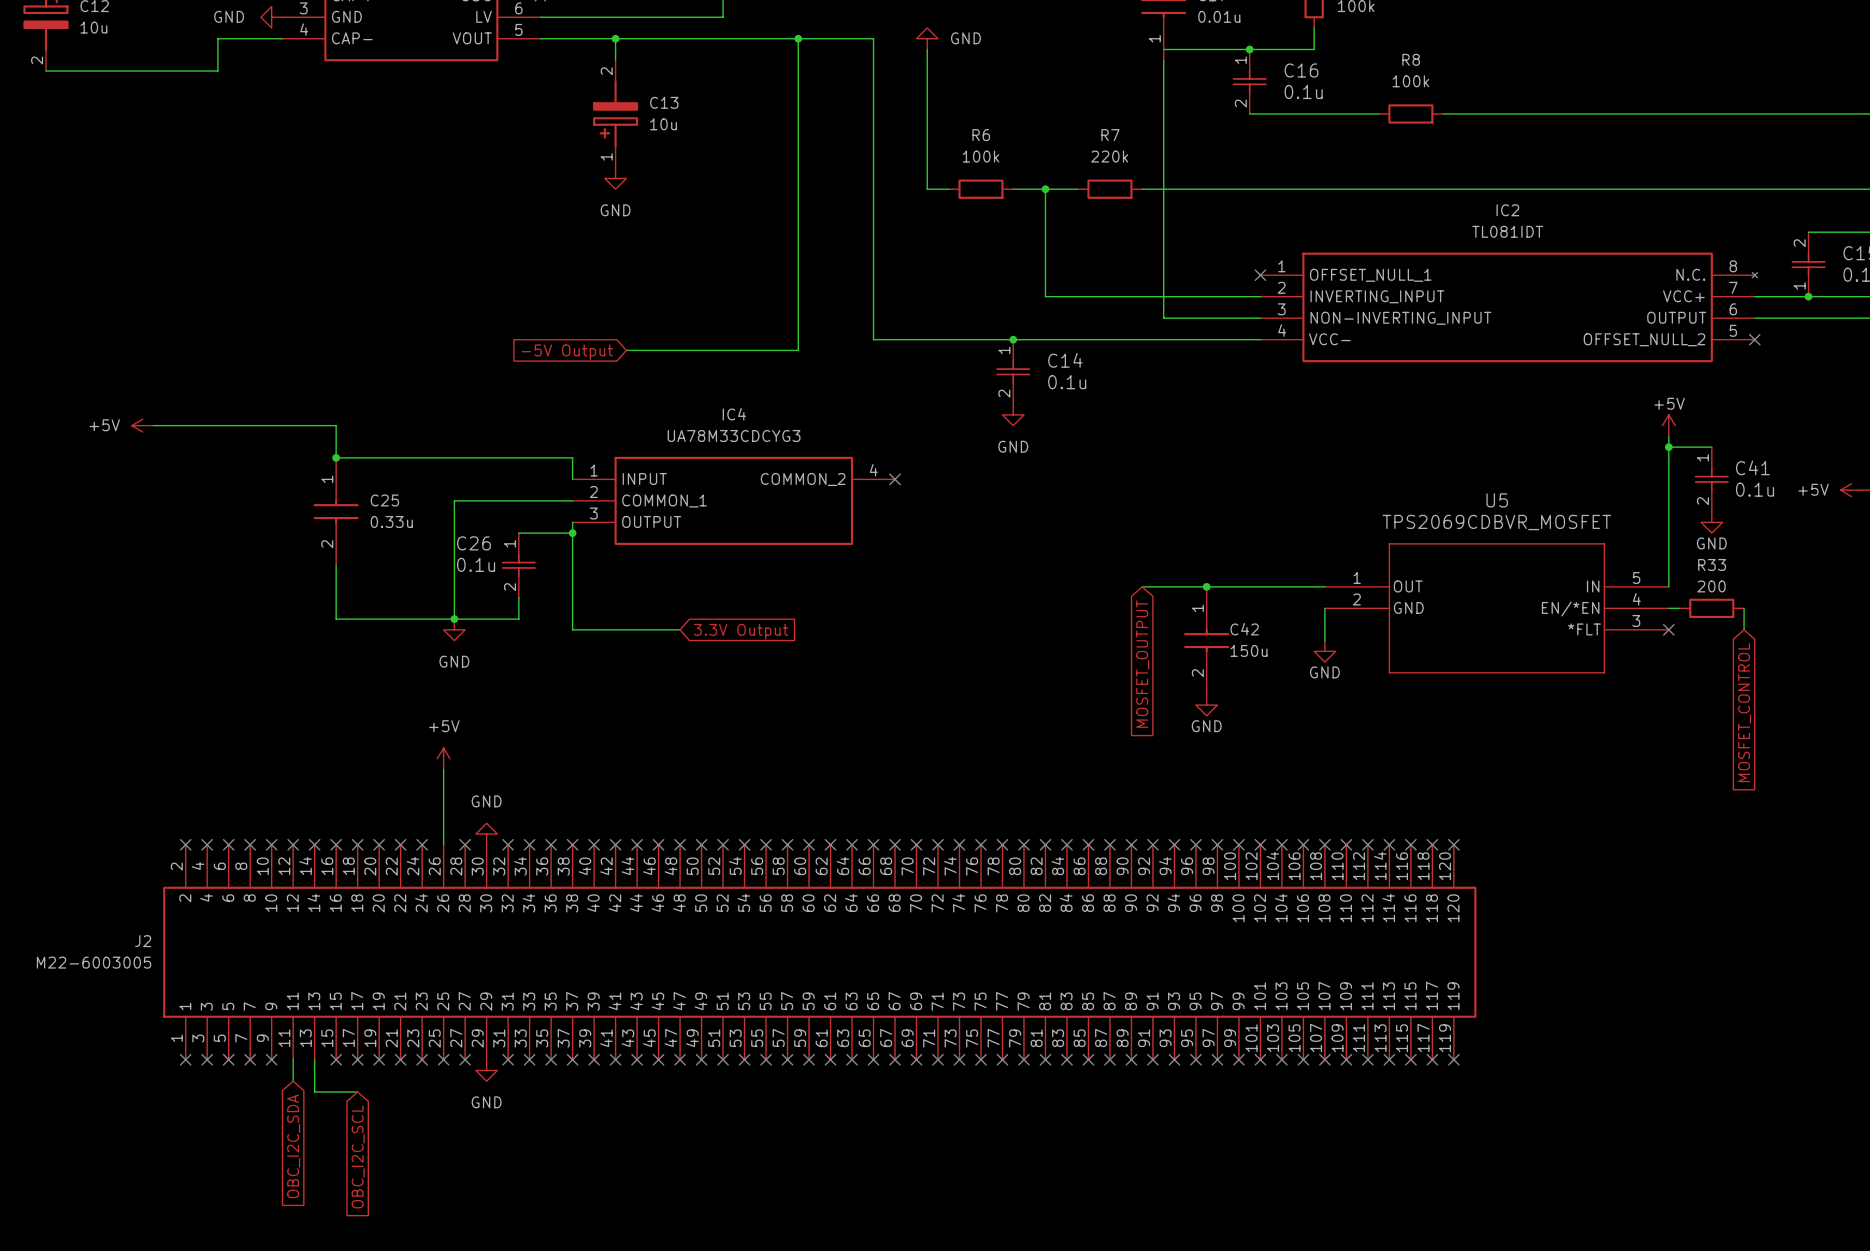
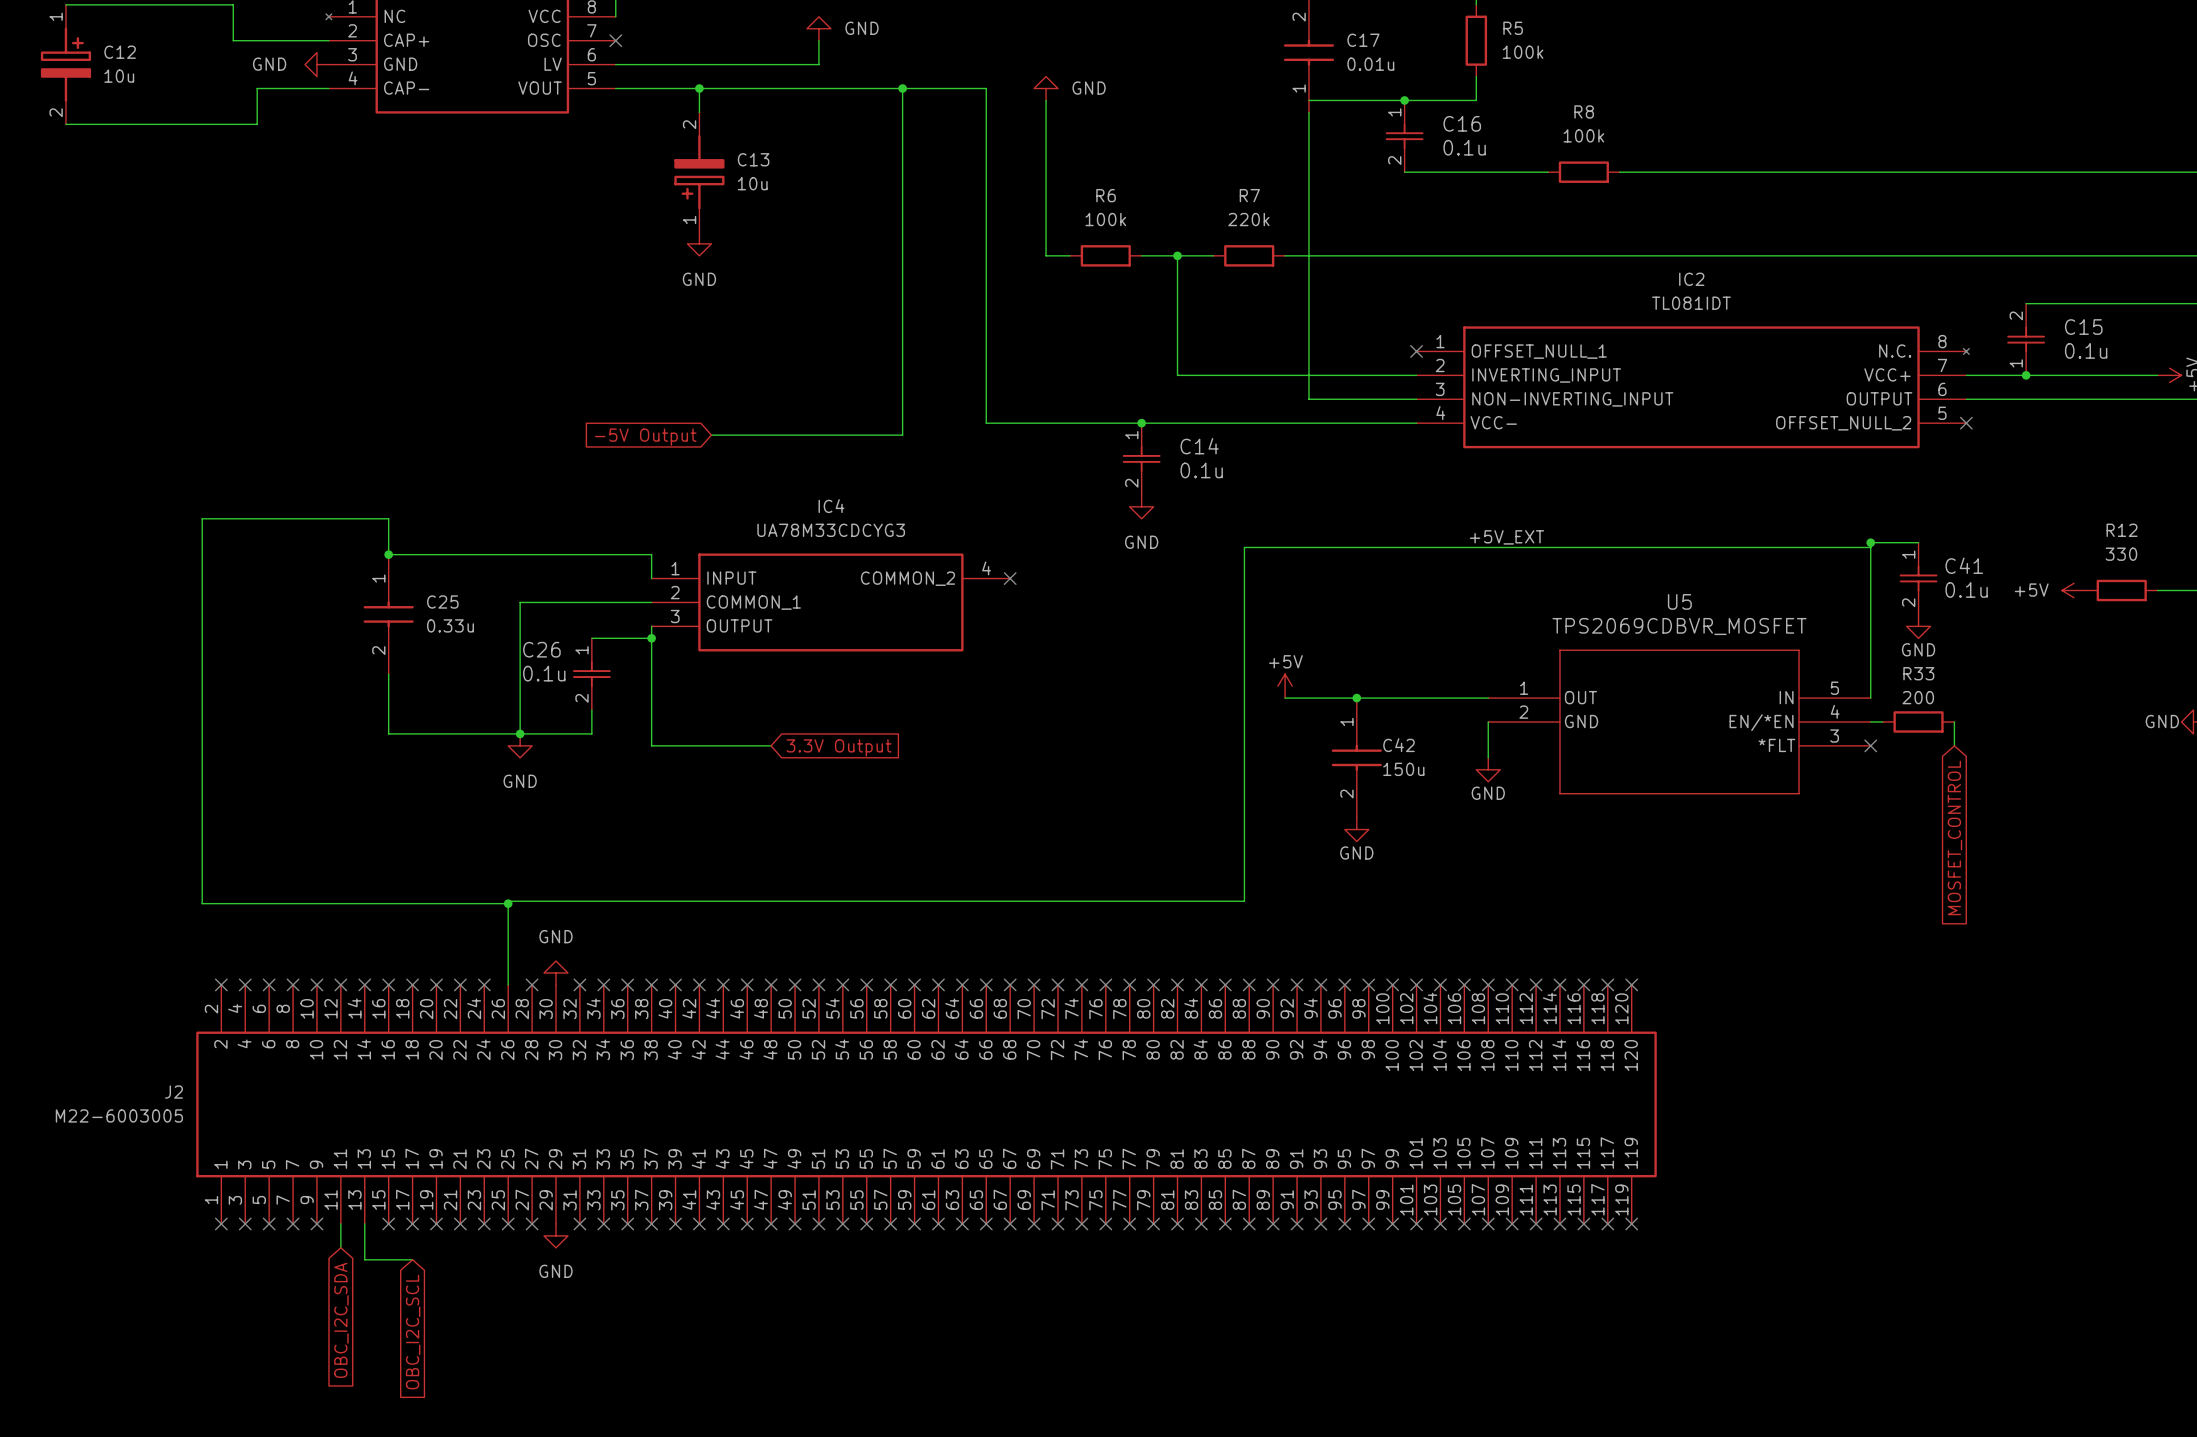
power symbol: +5V (142, 425) -> none
wire: (153, 425) (168, 425) -> (508, 903) (202, 903) (202, 518)
power symbol: +5V (1668, 425) -> none
wire: (1668, 436) (1668, 447) -> none
label: none -> +5V_EXT (1506, 537)
wire: none -> (1870, 547) (1244, 547) (1244, 901) (508, 901)
power symbol: none -> +5V (1285, 686)
global label: MOSFET_OUTPUT (1142, 664) -> none
power symbol: +5V (443, 758) -> none
junction: none -> (508, 903)

